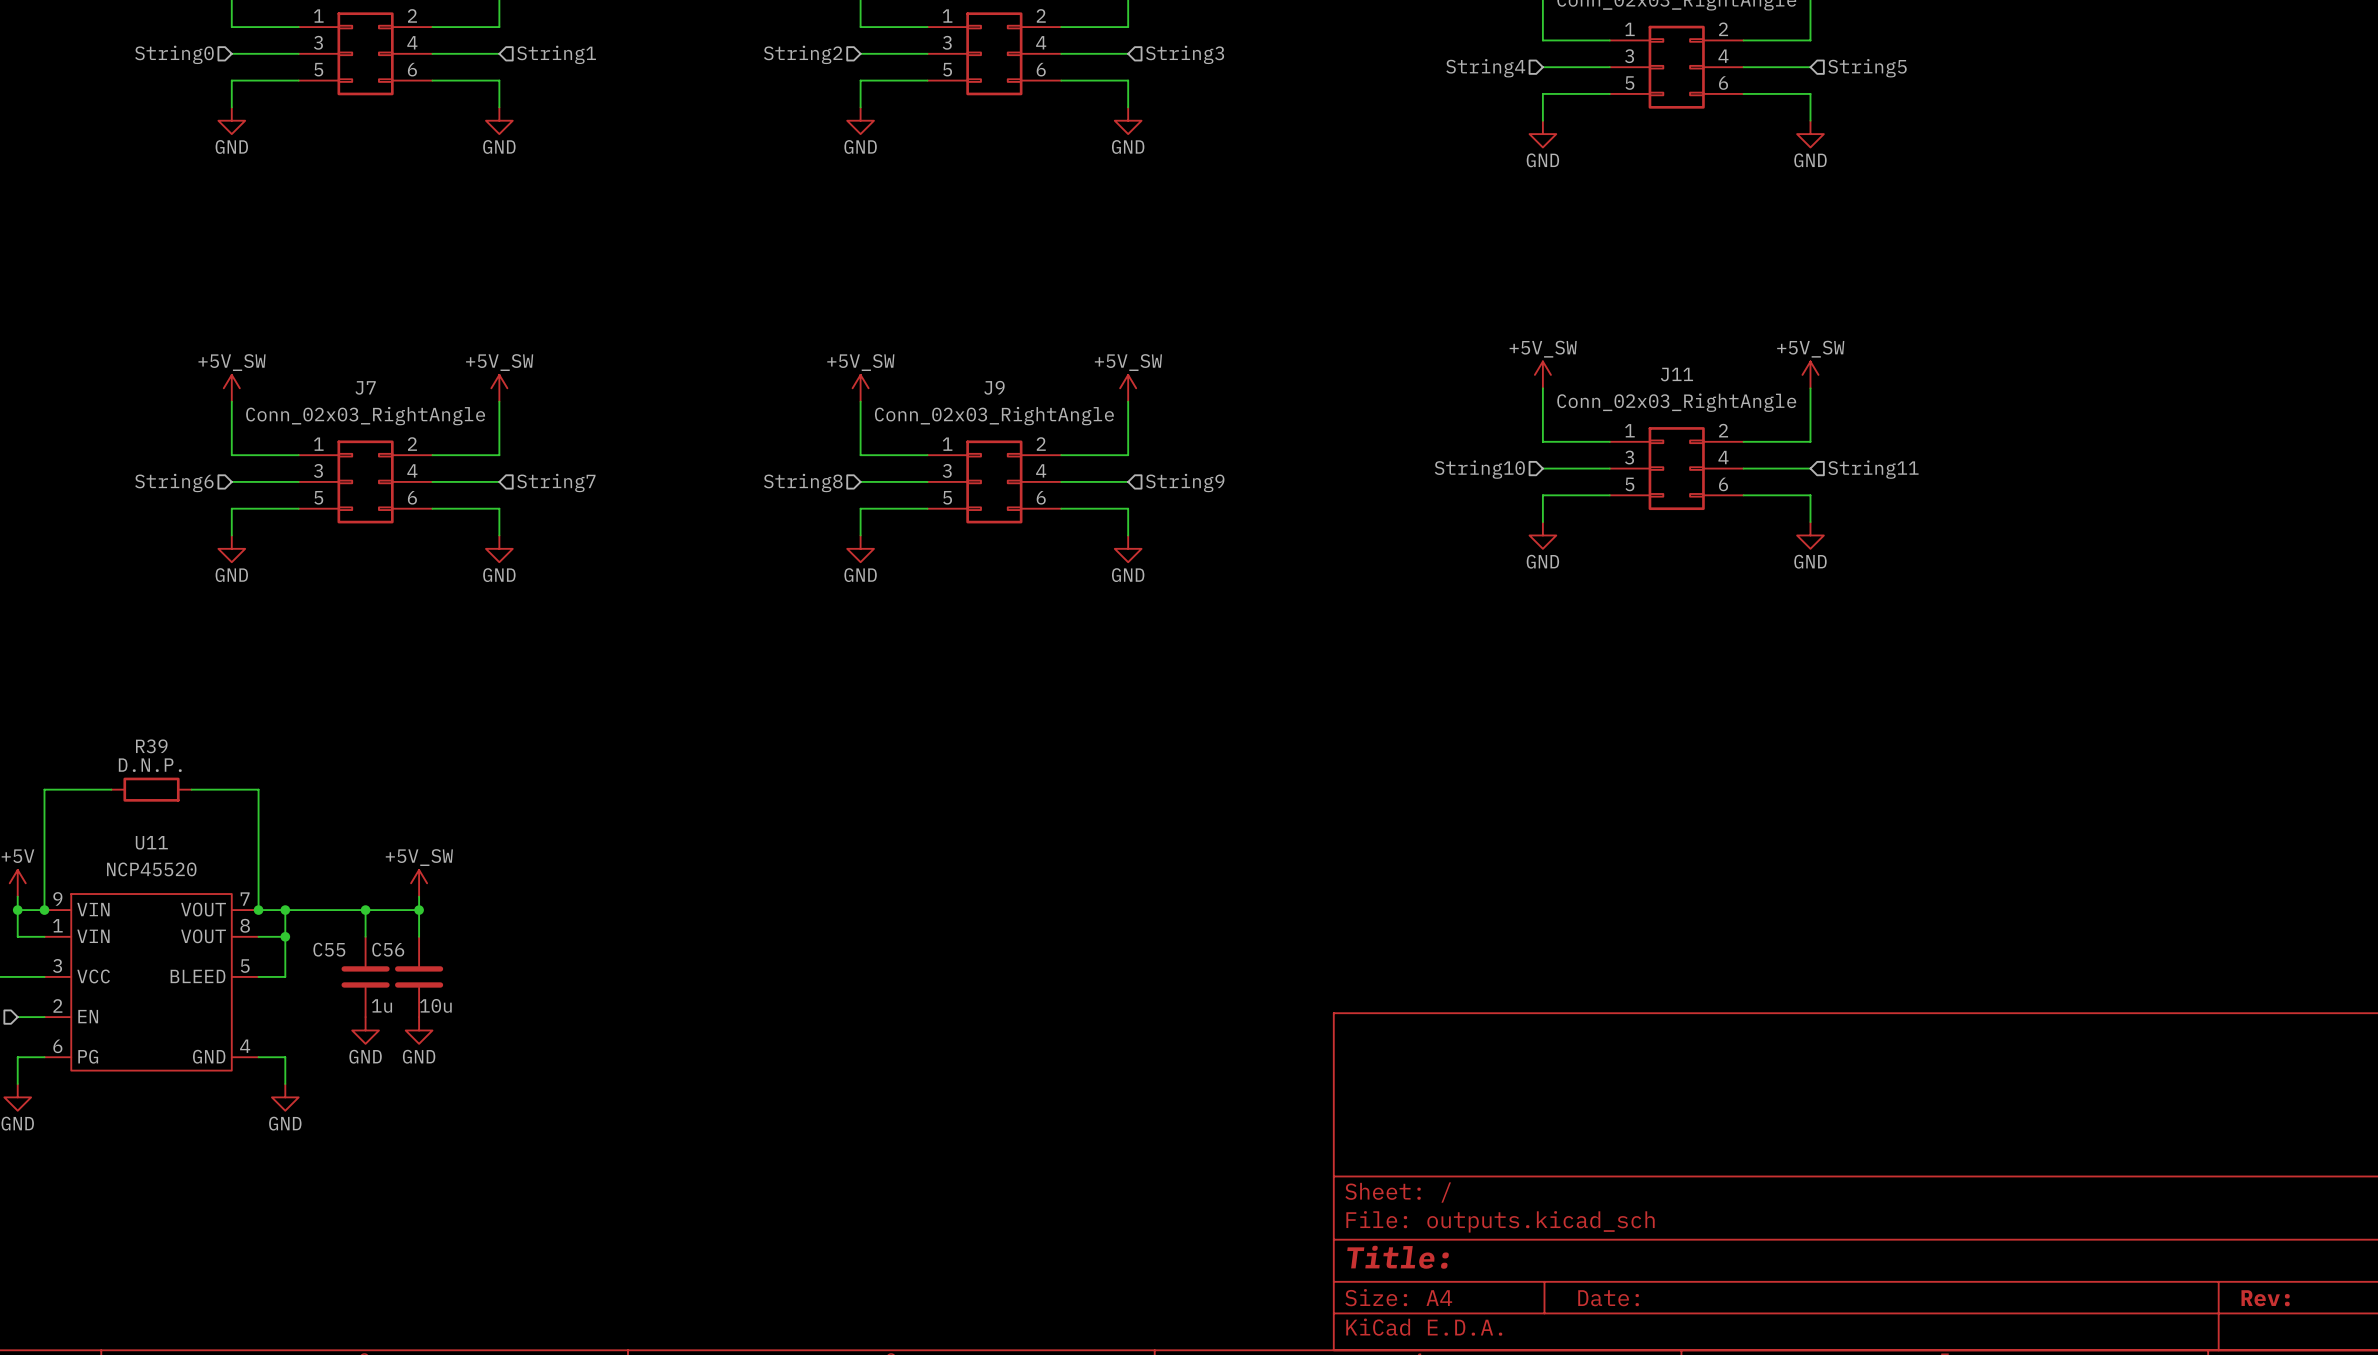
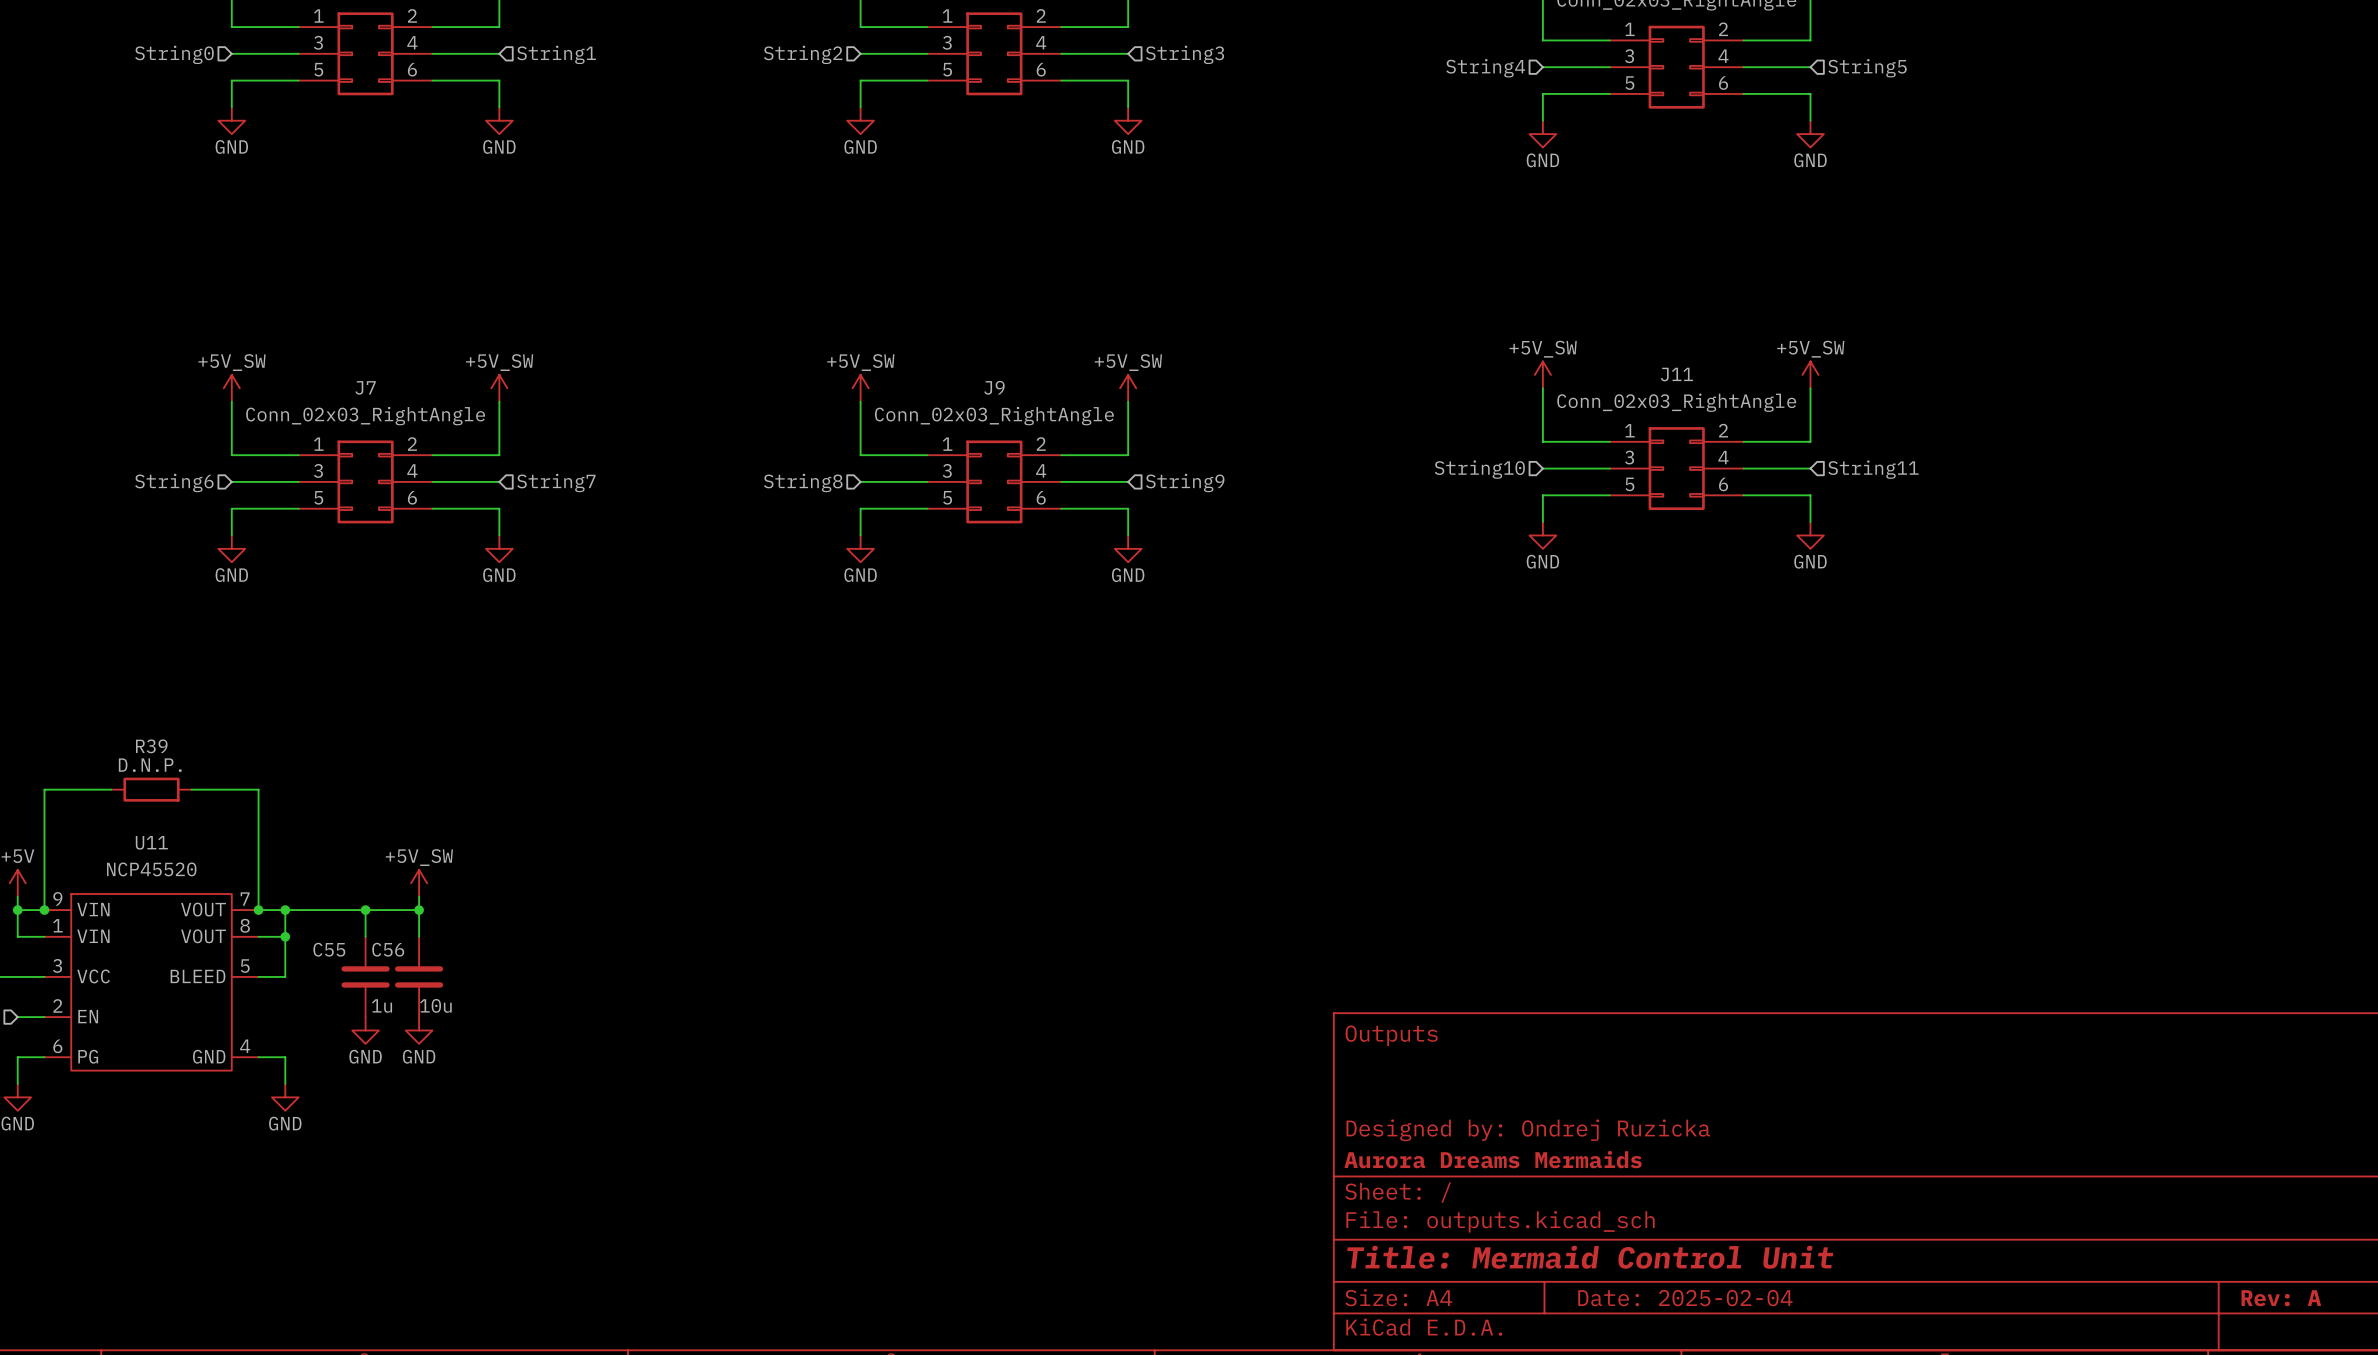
title block: none -> Outputs (1391, 1035)
title block: none -> Designed by: Ondrej Ruzicka (1528, 1130)
title block: none -> Aurora Dreams Mermaids (1493, 1159)
title block: Title: (1398, 1257) -> Title: Mermaid Control Unit (1590, 1257)
title block: Date: (1608, 1298) -> Date: 2025-02-04 (1685, 1298)
title block: Rev: (2265, 1298) -> Rev: A (2281, 1298)

